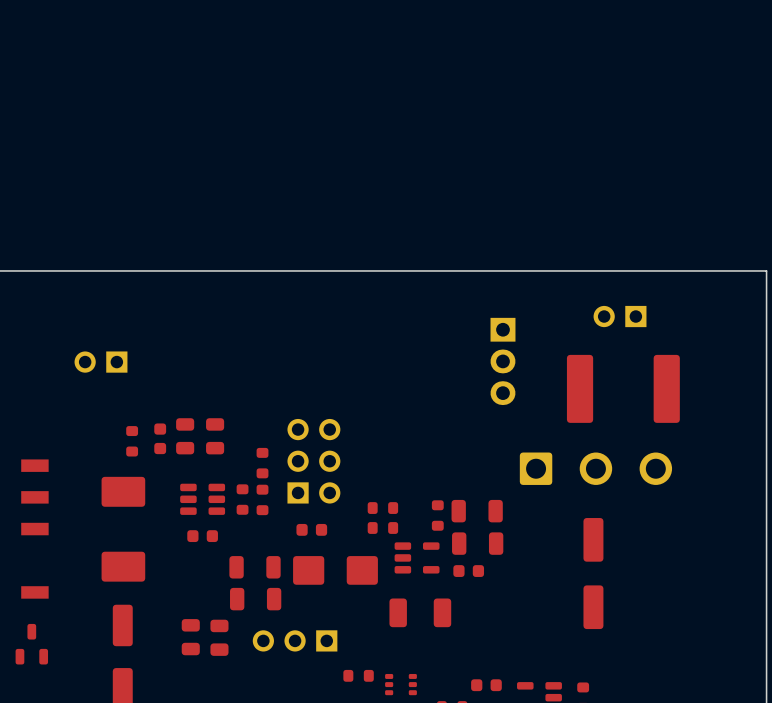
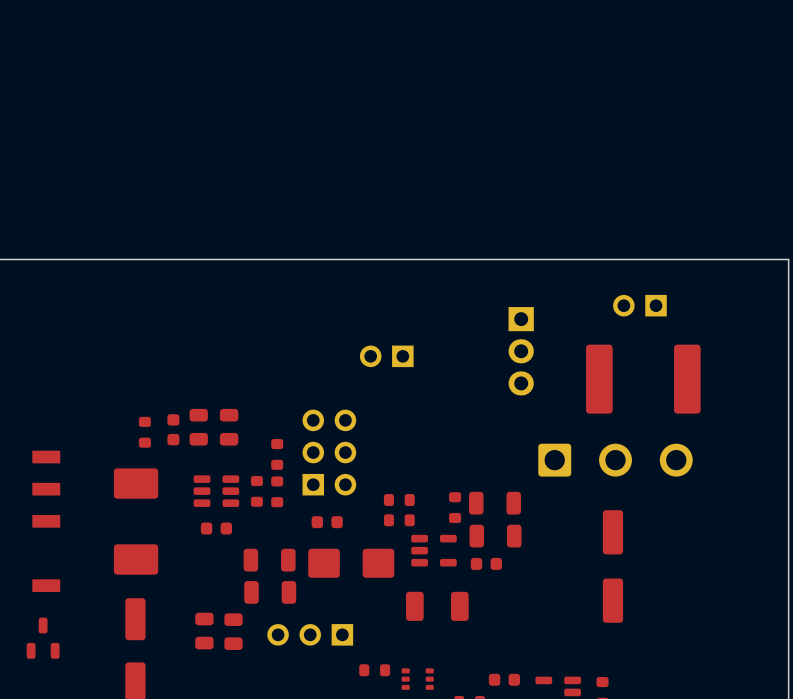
part position: (101, 362) -> (386, 356)

